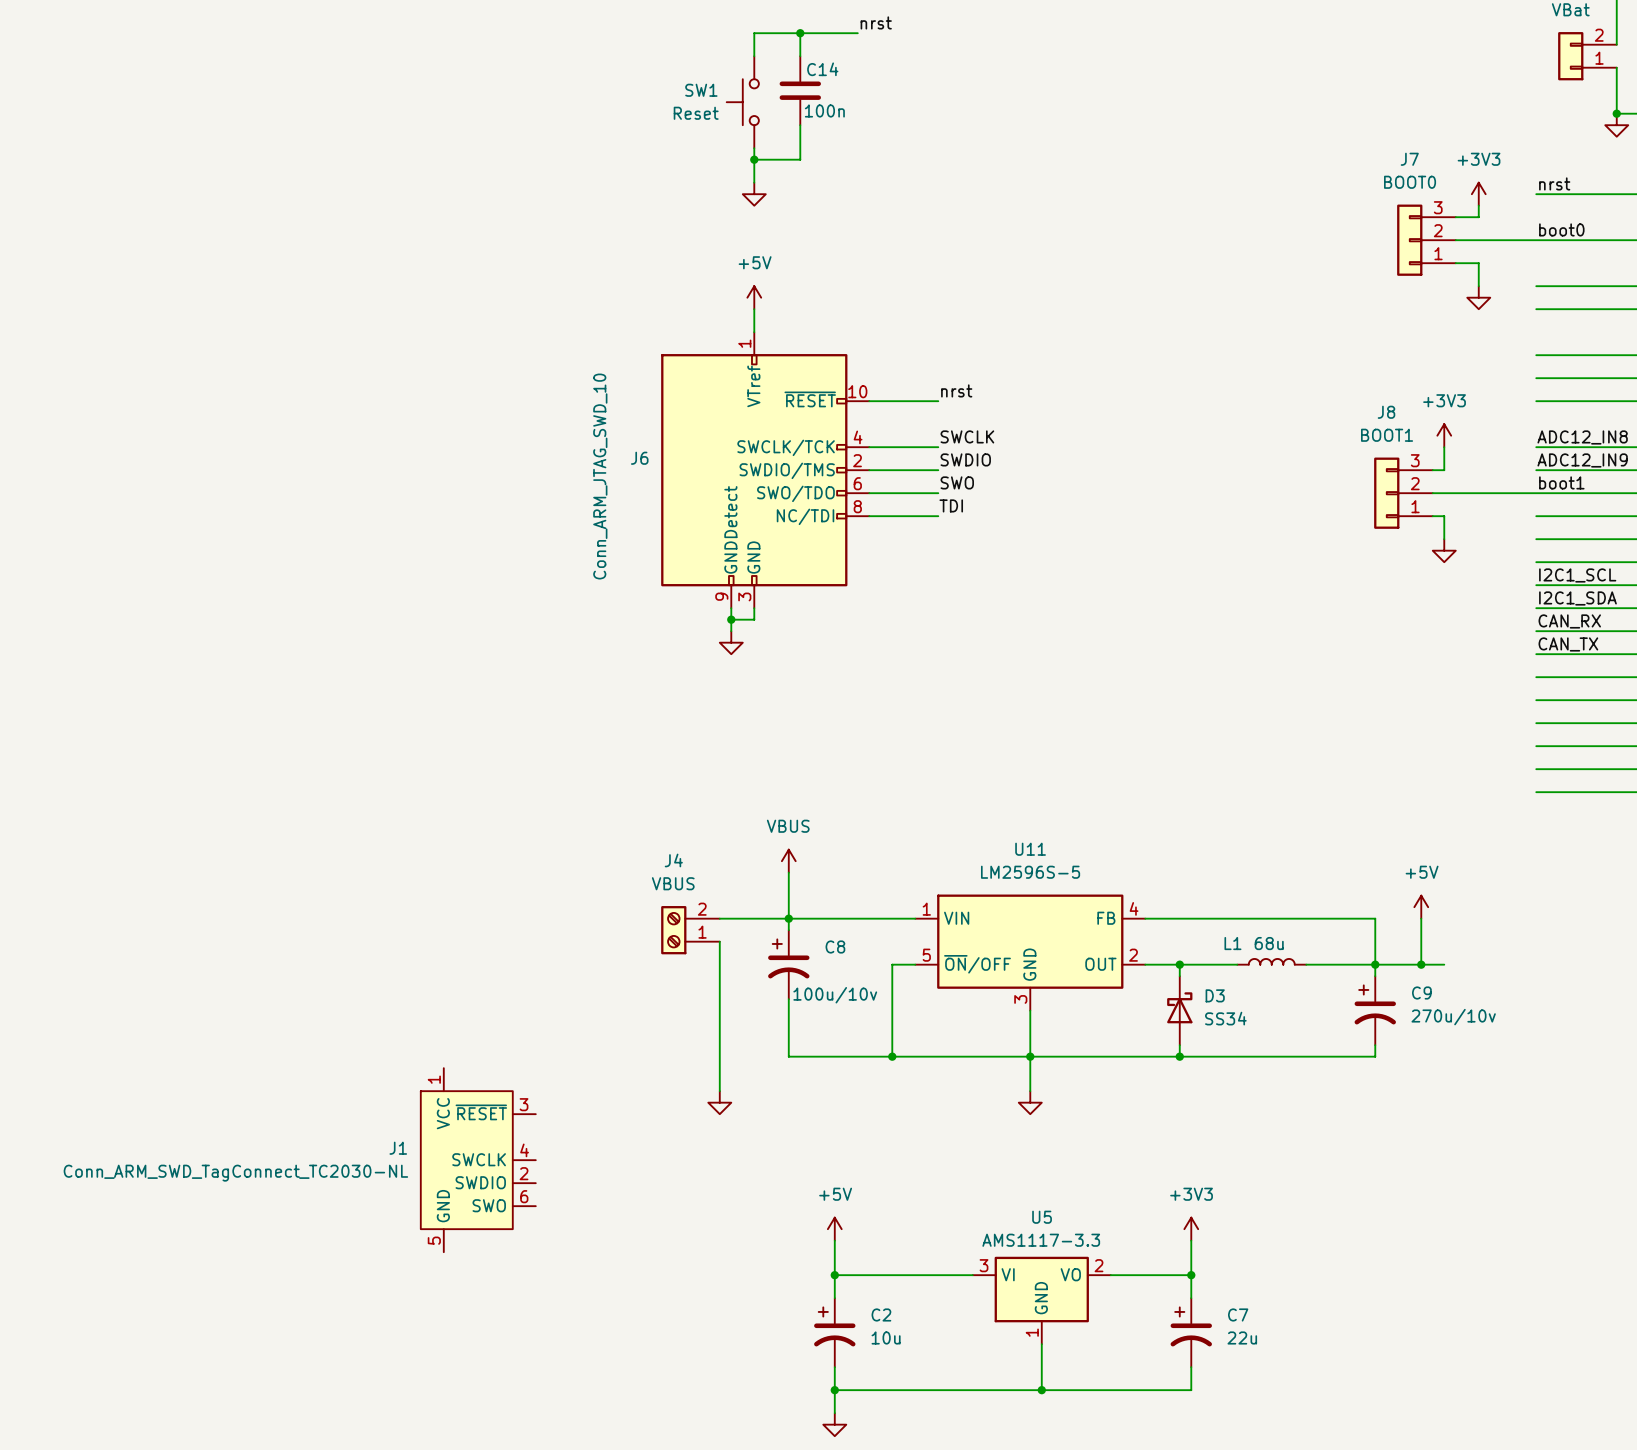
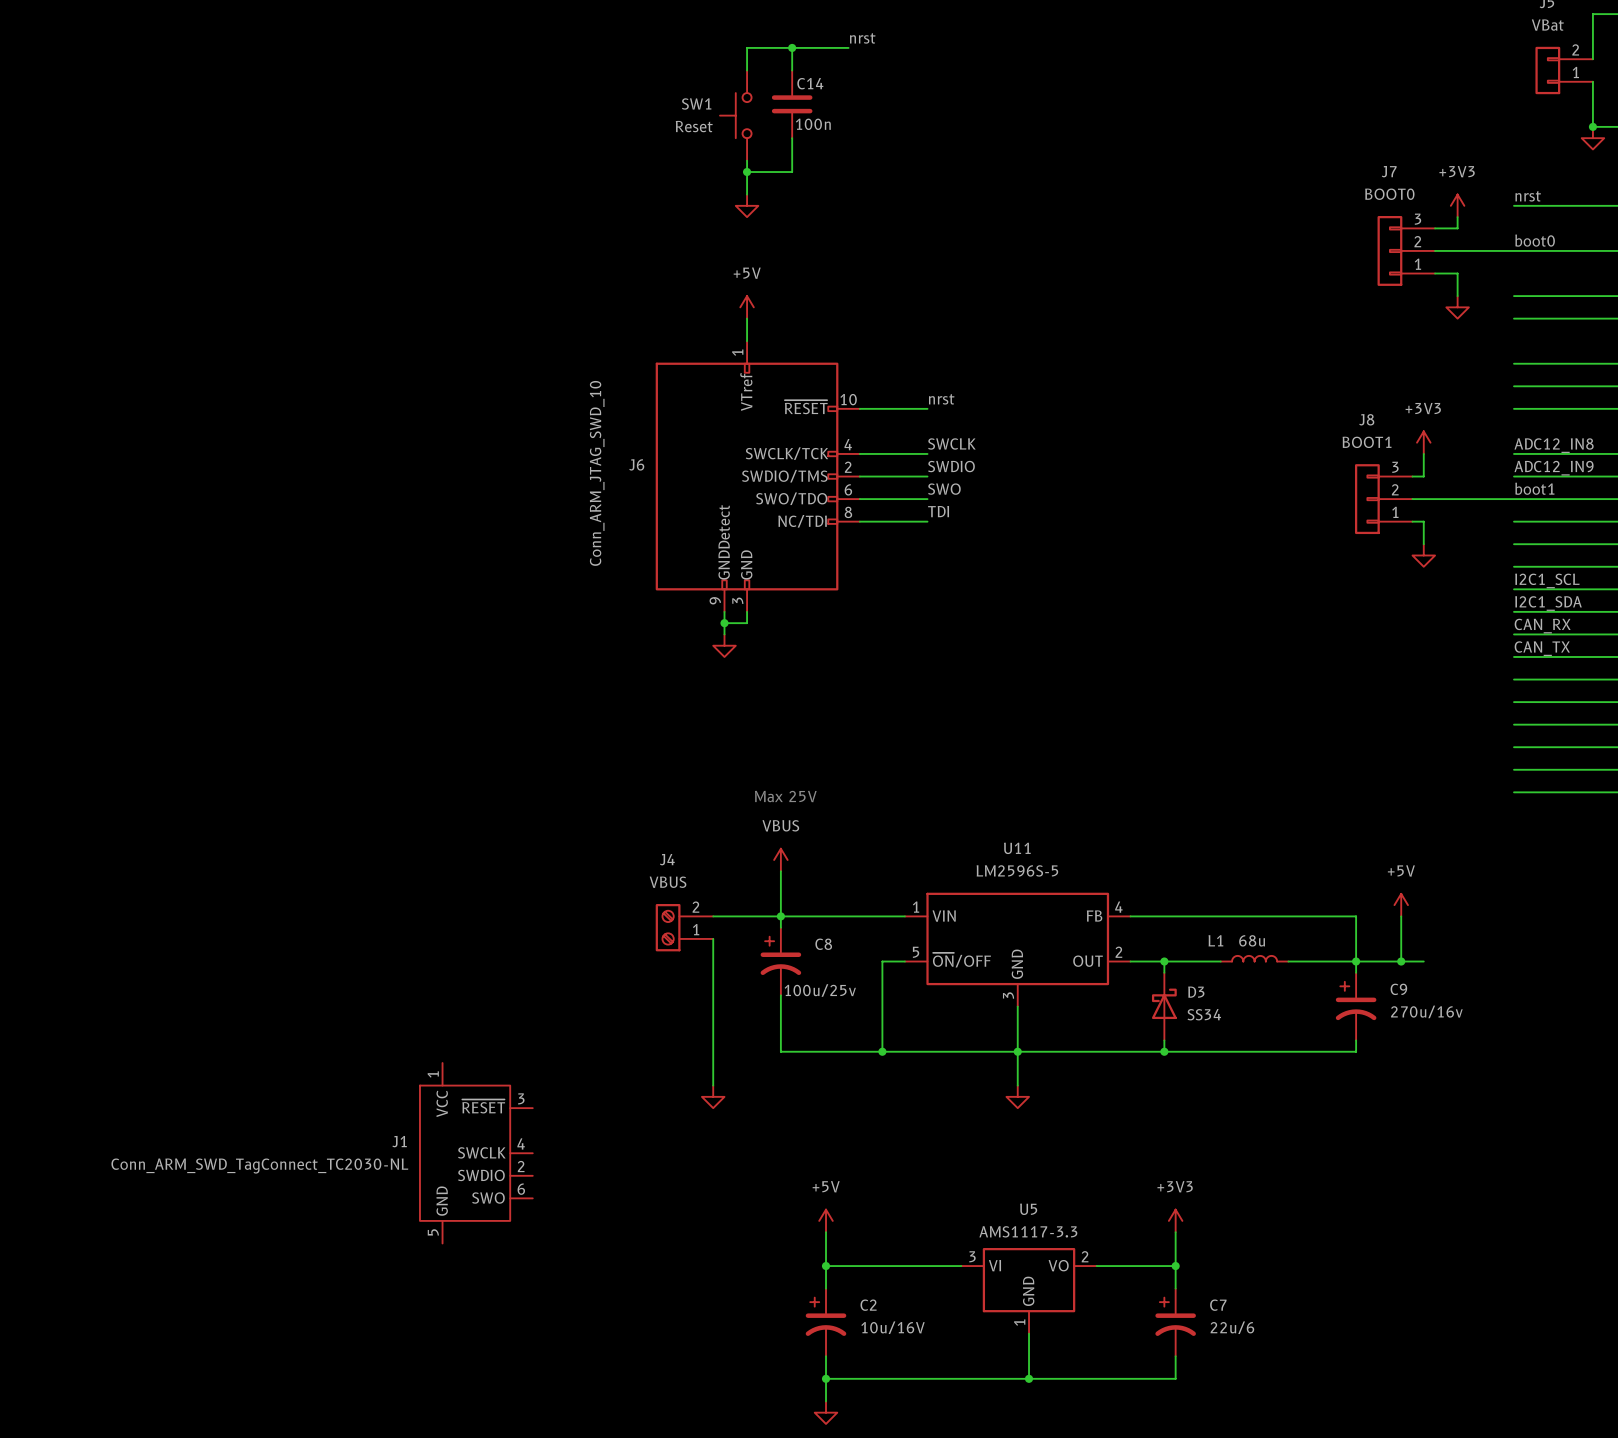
text: none -> Max 25V (785, 796)
C8 value: 100u/10v (835, 995) -> 100u/25v (820, 990)
C9 value: 270u/10v (1453, 1017) -> 270u/16v (1426, 1011)
C2 value: 10u (886, 1337) -> 10u/16V (893, 1327)
C7 value: 22u (1242, 1337) -> 22u/6 (1232, 1327)

